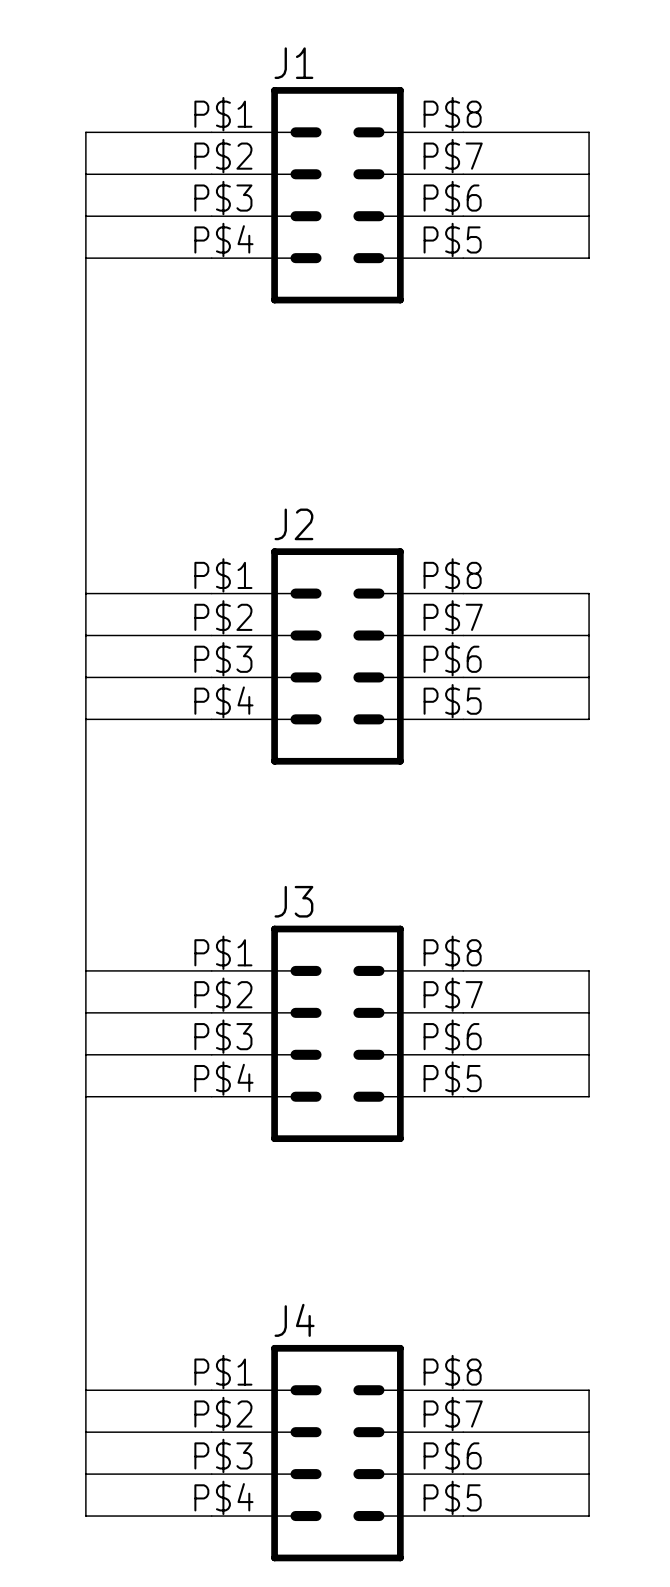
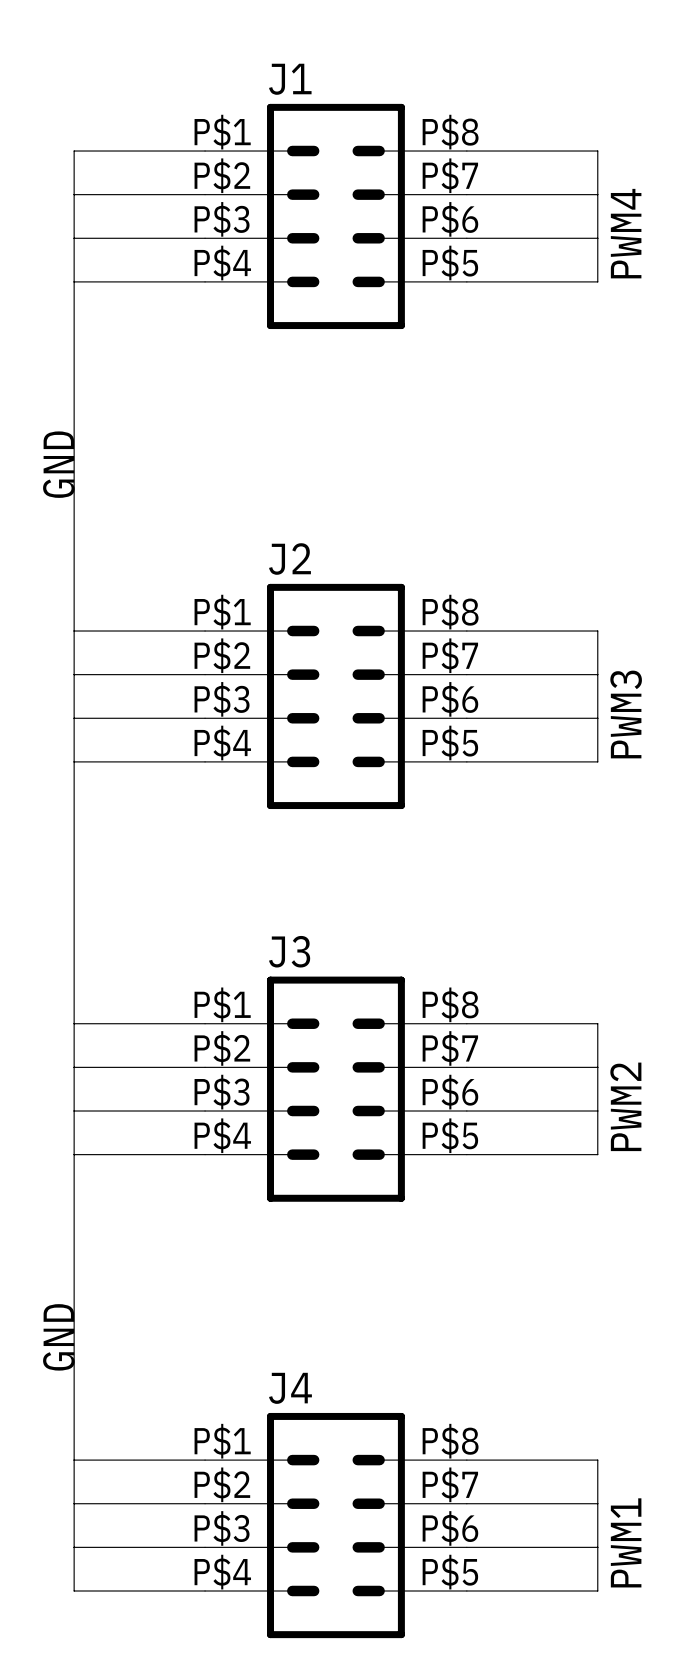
label: none -> PWM4 (626, 233)
label: none -> GND (58, 464)
label: none -> PWM3 (626, 714)
label: none -> PWM2 (625, 1106)
label: none -> GND (58, 1337)
label: none -> PWM1 (626, 1542)

